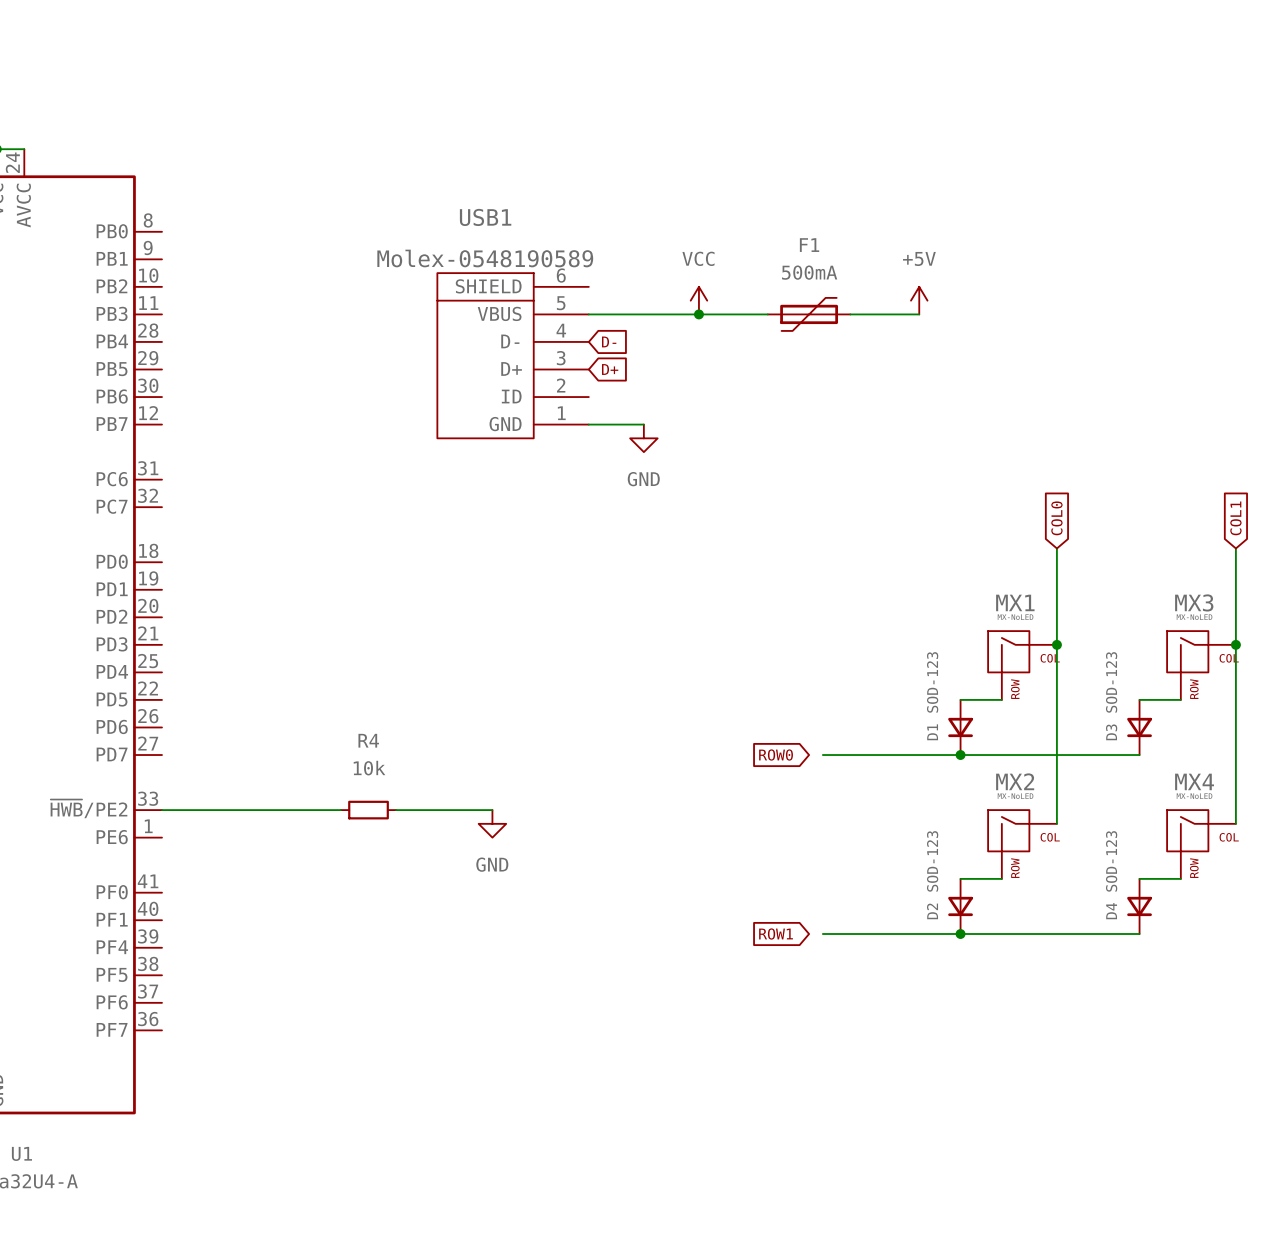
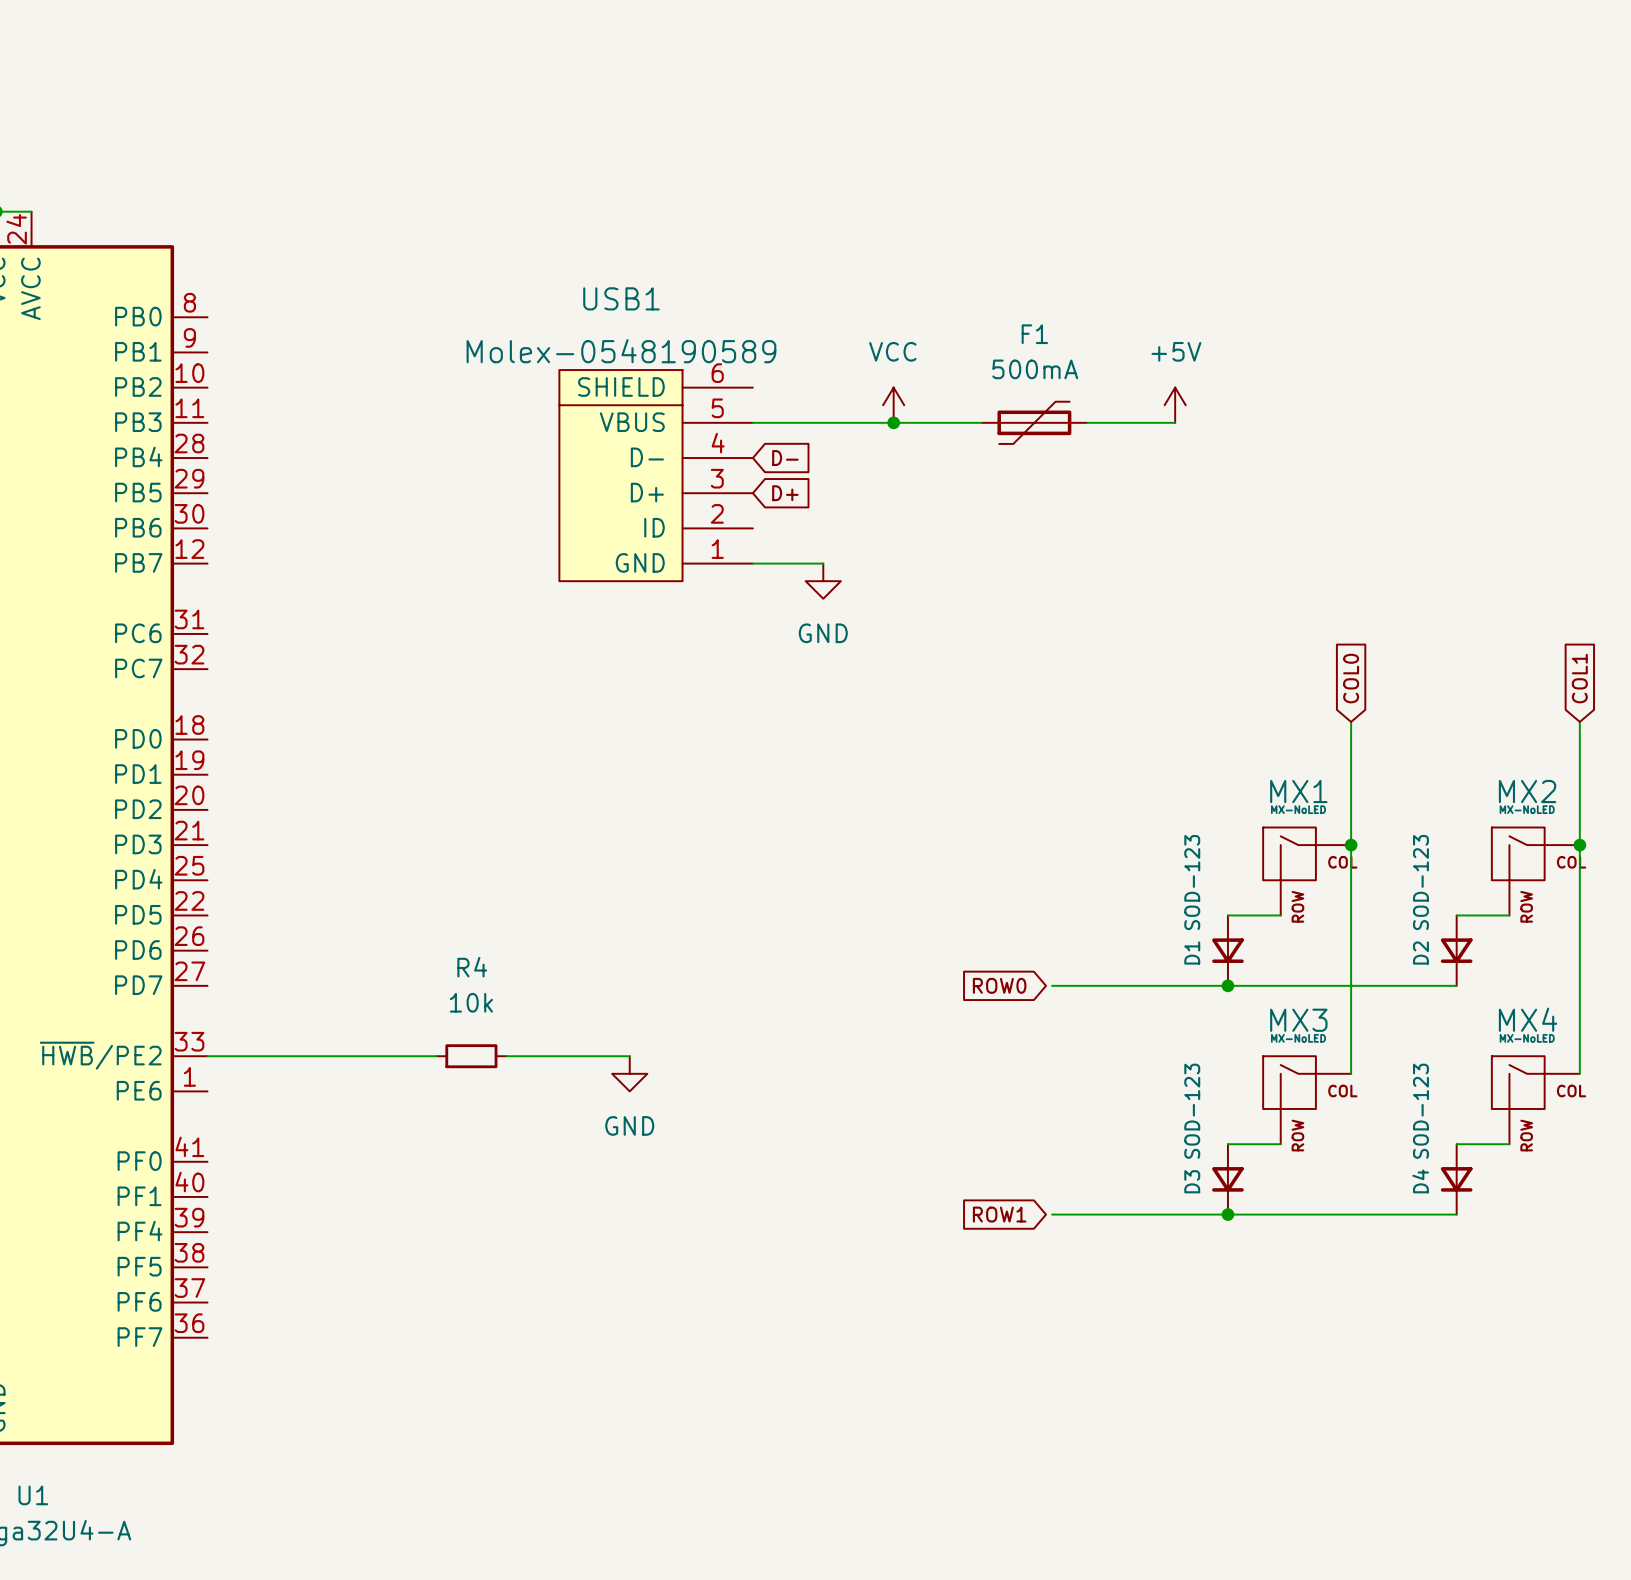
MX3 name: MX3 (1194, 602) -> MX2 (1527, 791)
D3 name: D3 (1111, 732) -> D2 (1420, 953)
MX2 name: MX2 (1015, 781) -> MX3 (1298, 1020)
D2 name: D2 (932, 911) -> D3 (1192, 1181)

